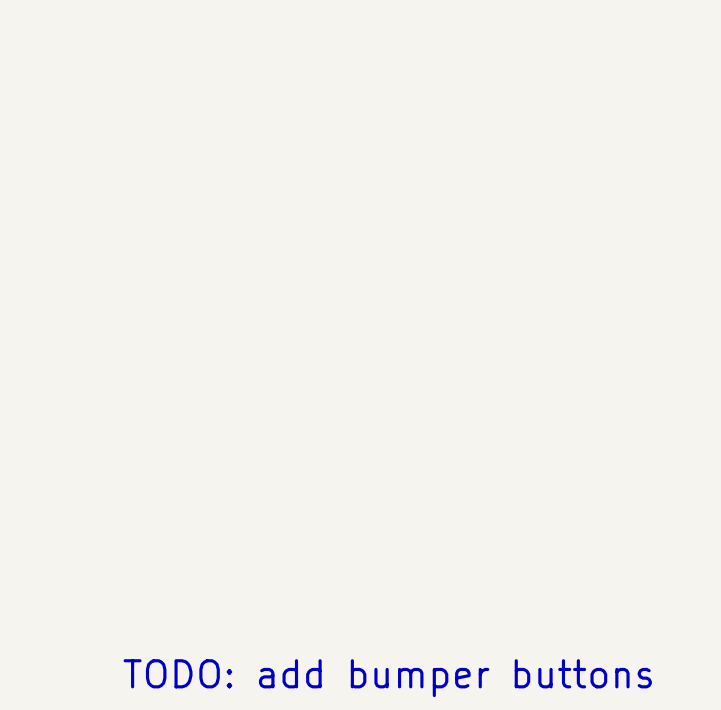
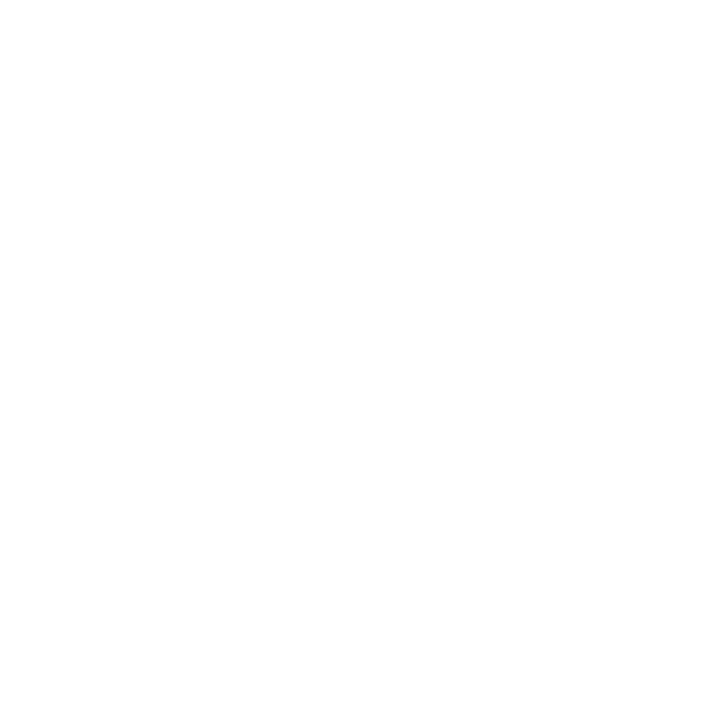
text: TODO: add bumper buttons (387, 678) -> none

